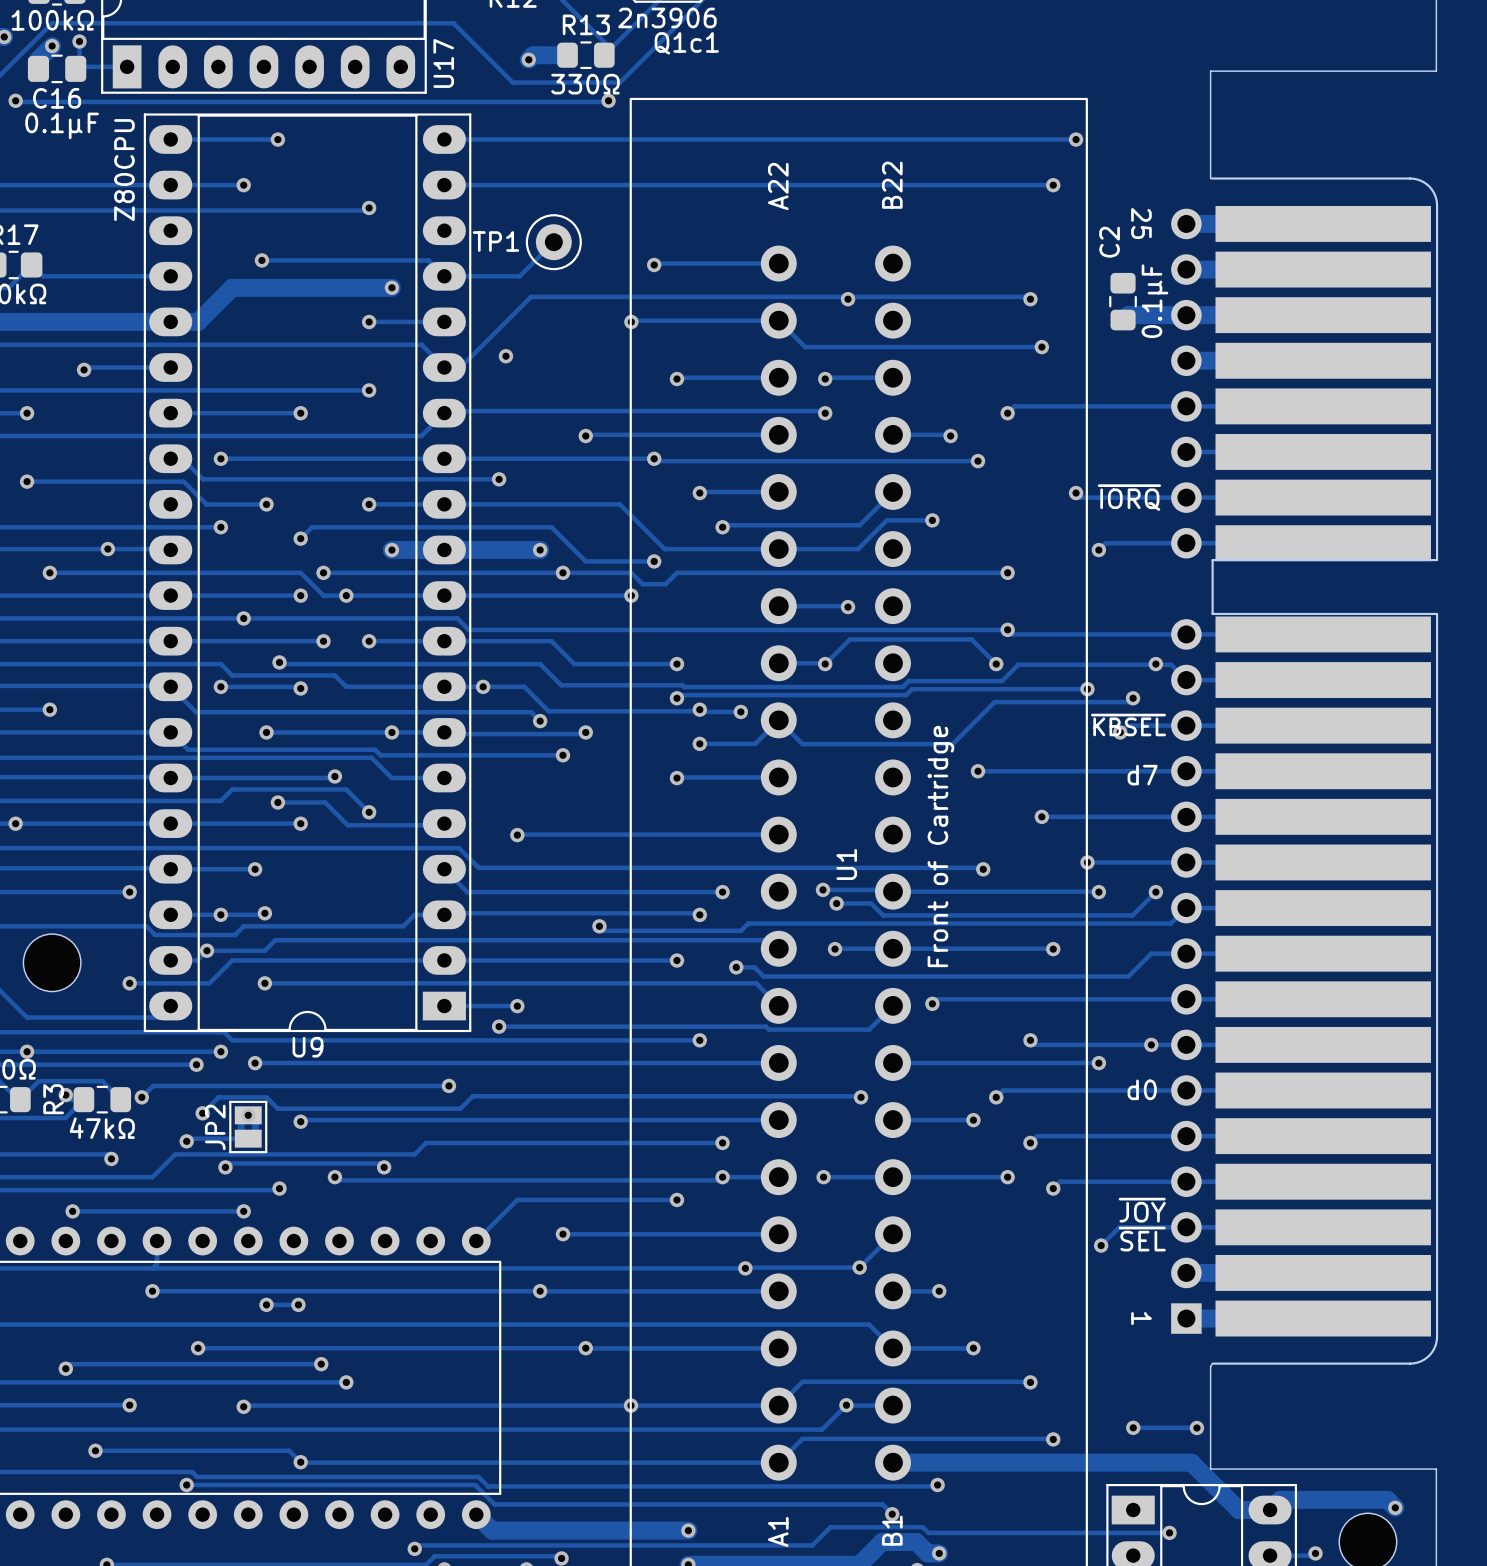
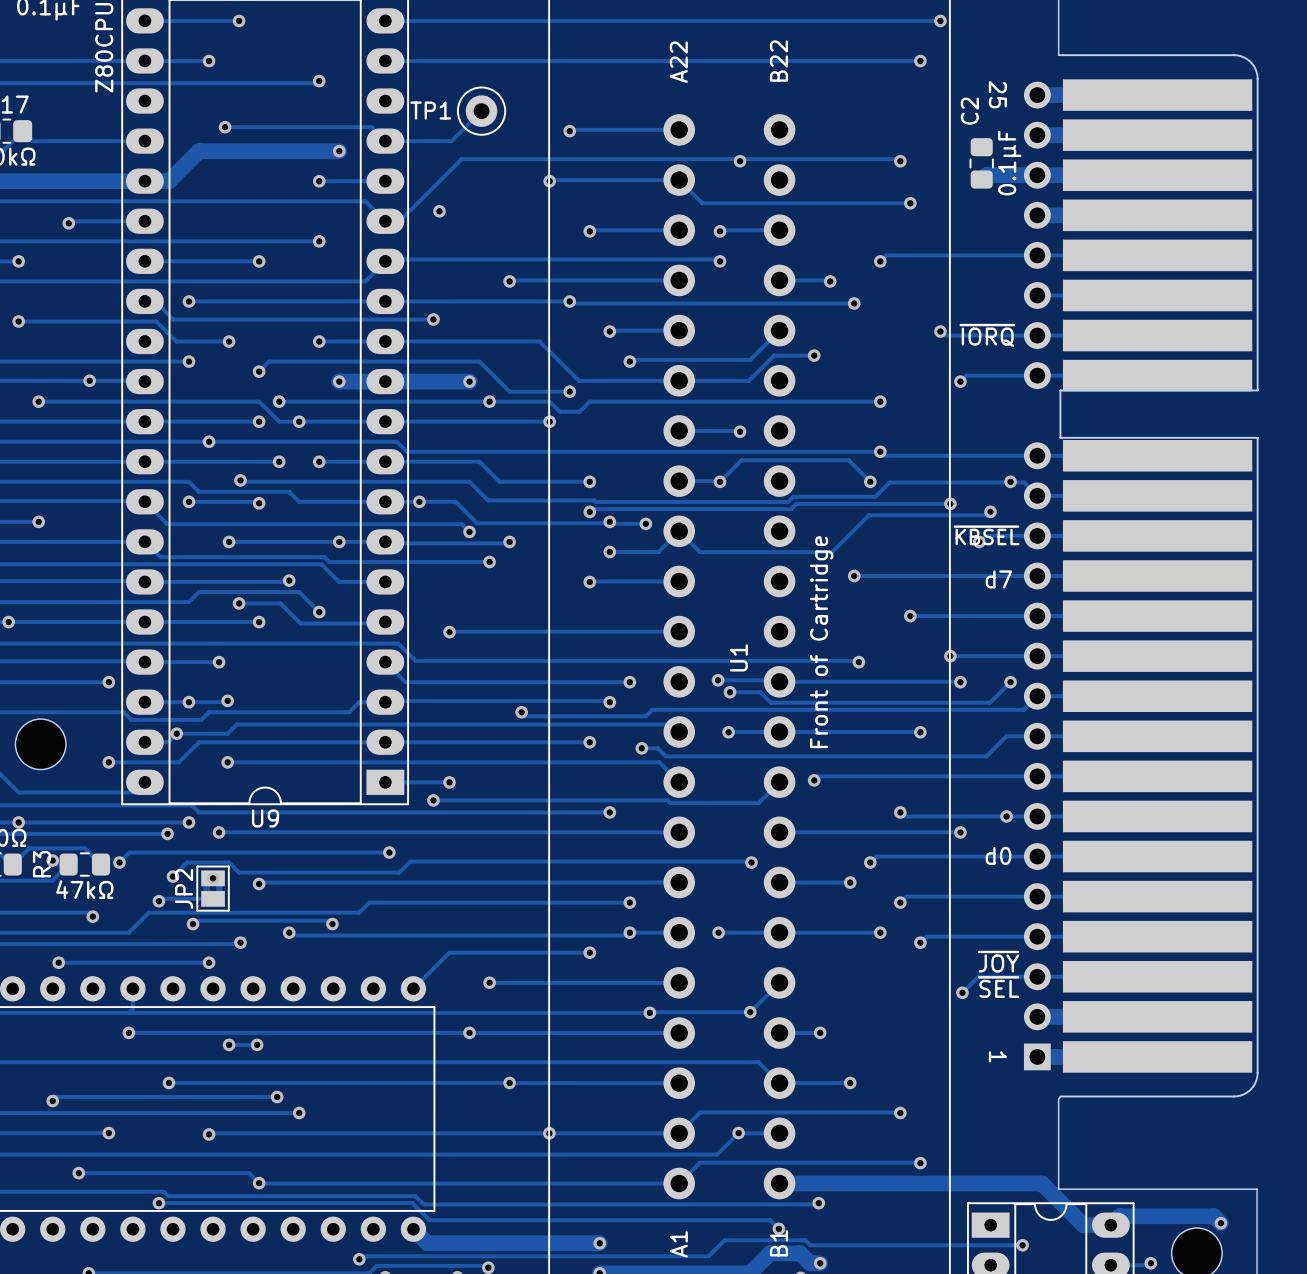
track: (1133, 1427) (1196, 1427) -> none
via: (1133, 1427) -> none
via: (1196, 1428) -> none

